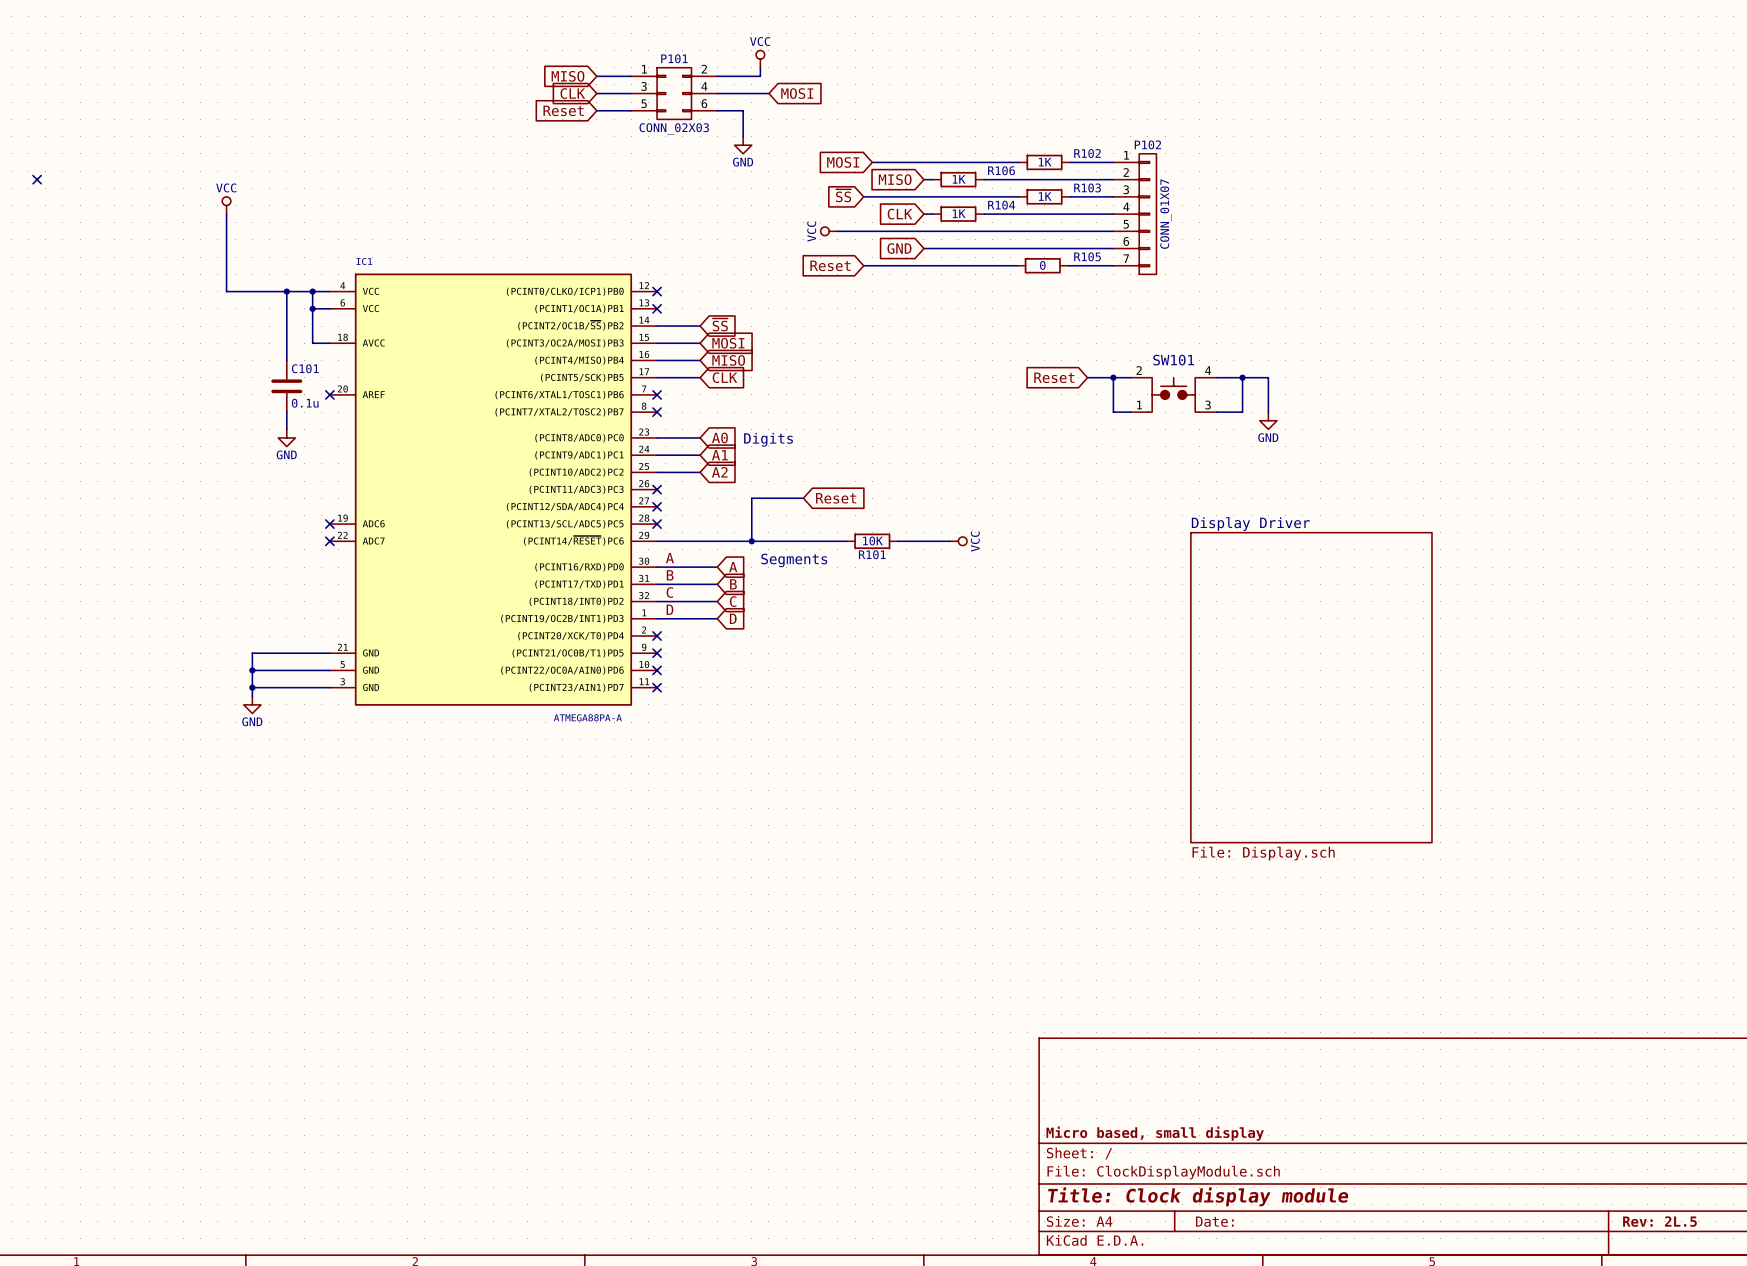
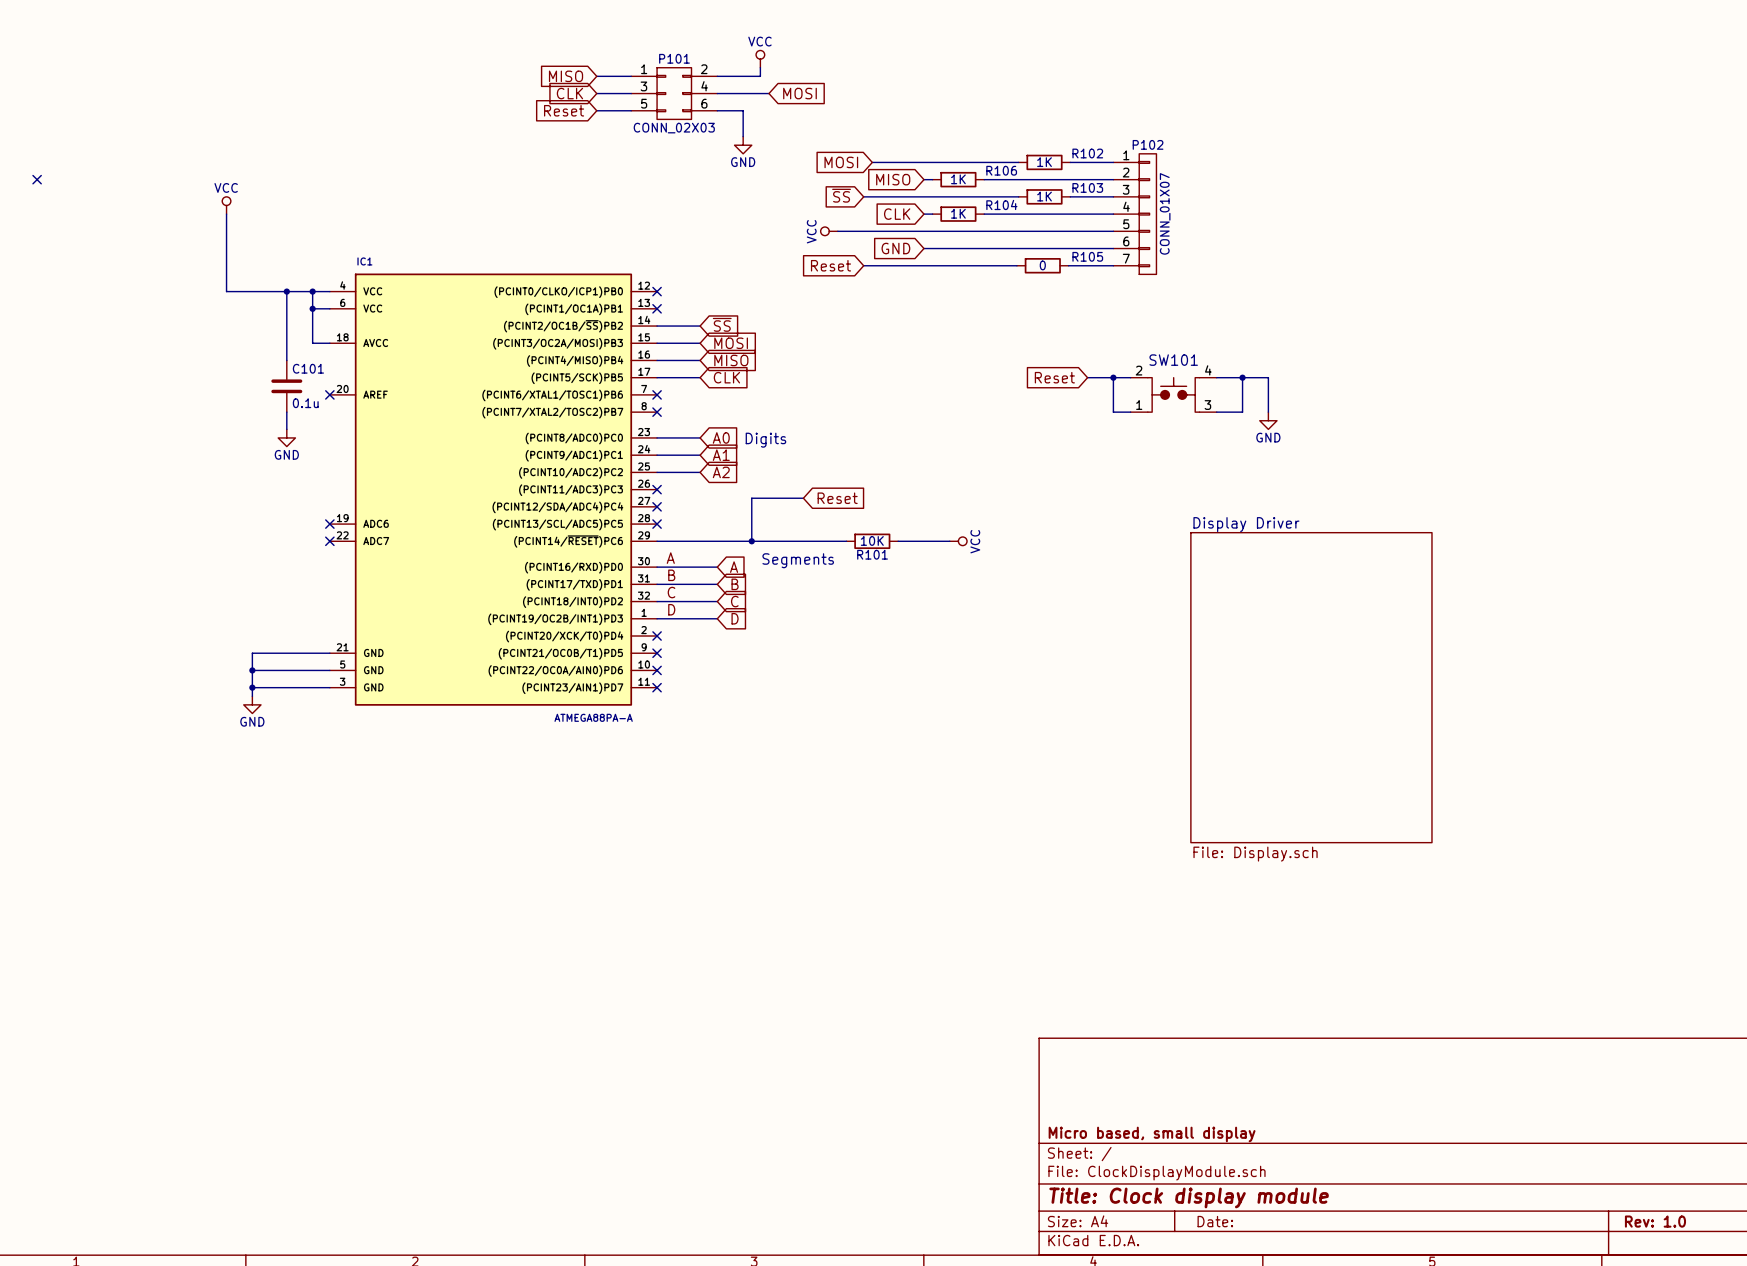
title block: Rev: 2L.5 (1659, 1221) -> Rev: 1.0 (1655, 1221)

